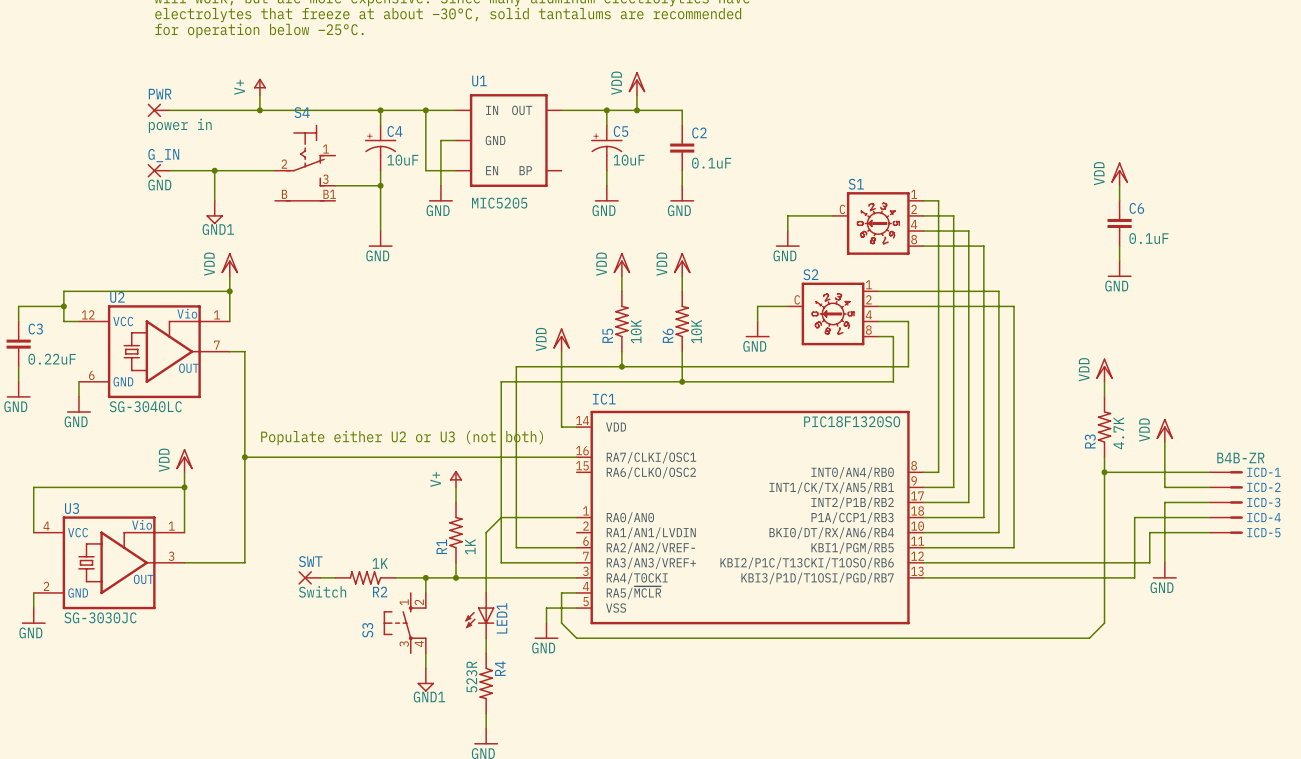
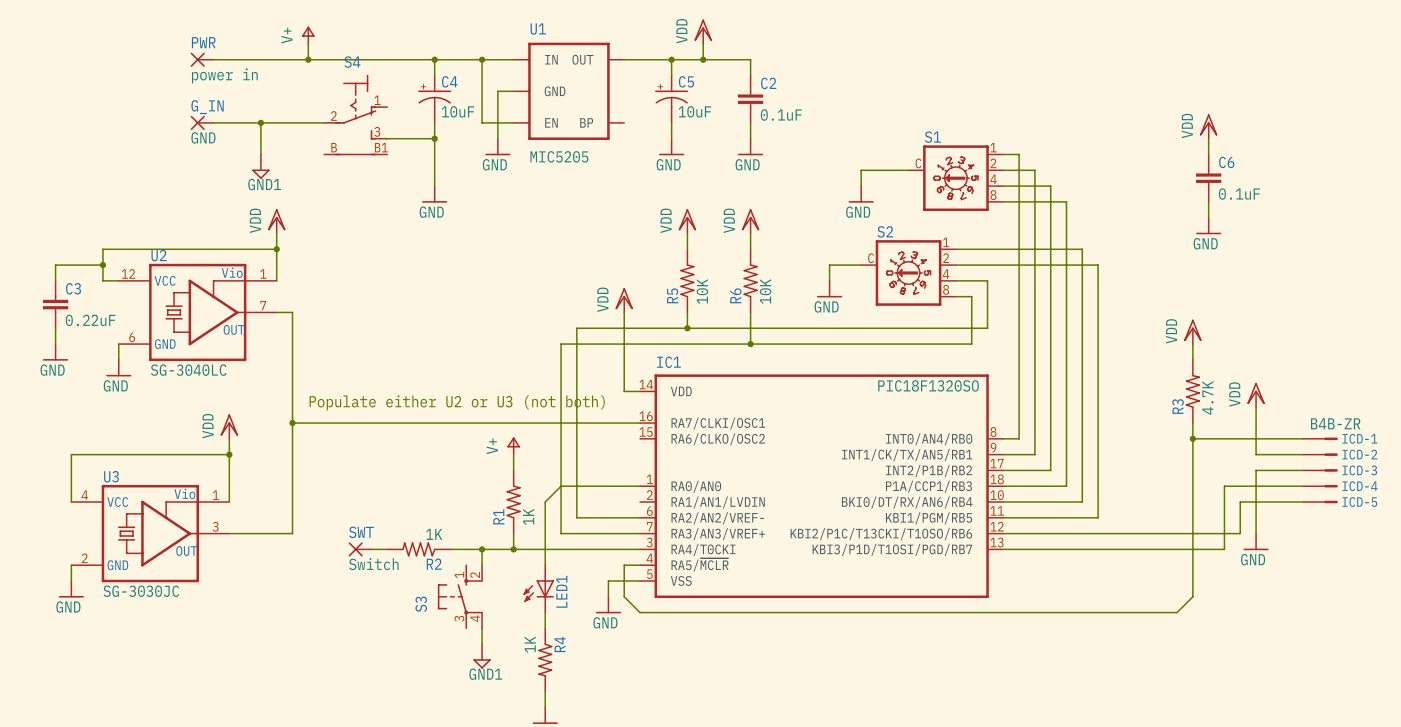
R4 value: 523R (471, 677) -> 1K (530, 644)

